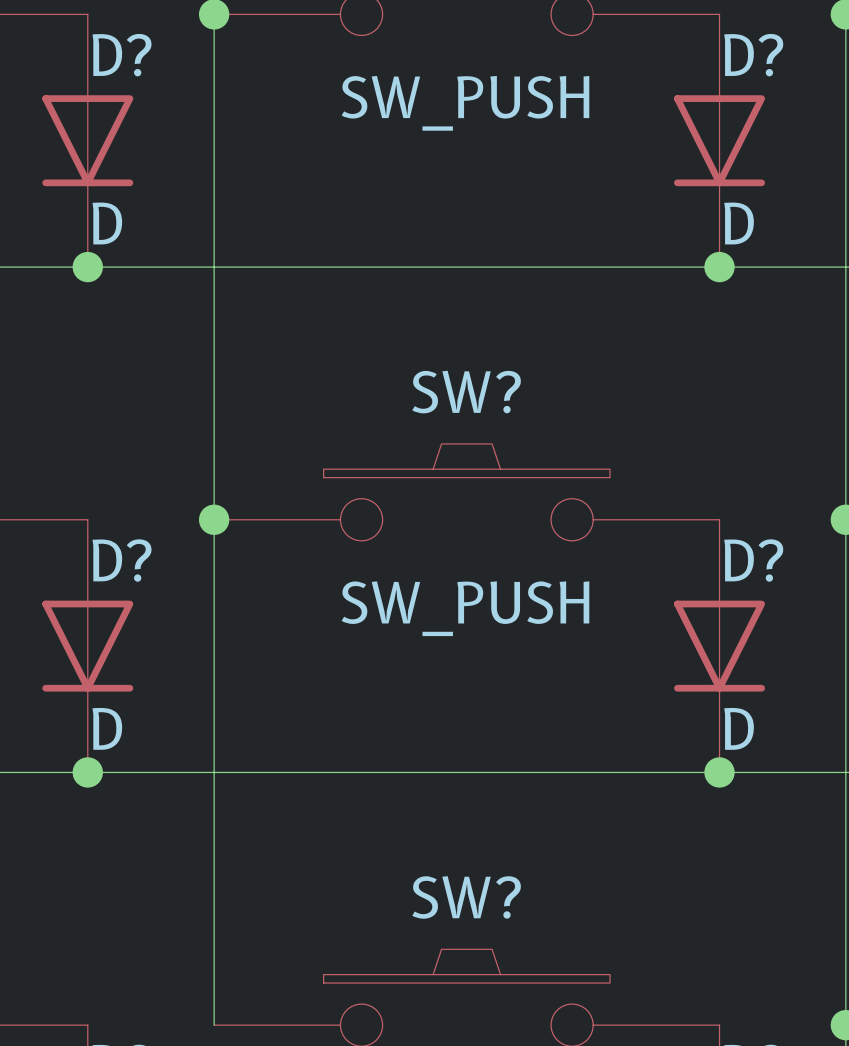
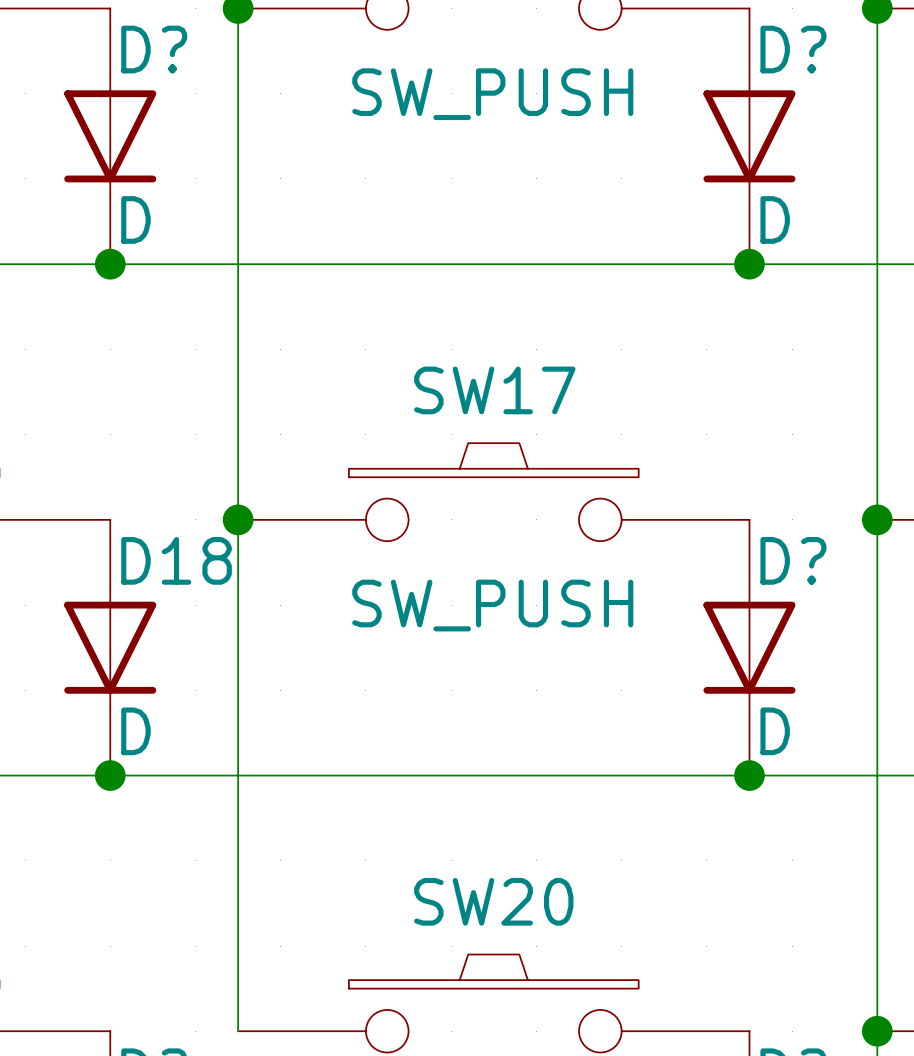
SW? name: SW? (466, 392) -> SW17 (494, 390)
D? name: D? (122, 560) -> D18 (176, 560)
SW? name: SW? (466, 897) -> SW20 (493, 901)

